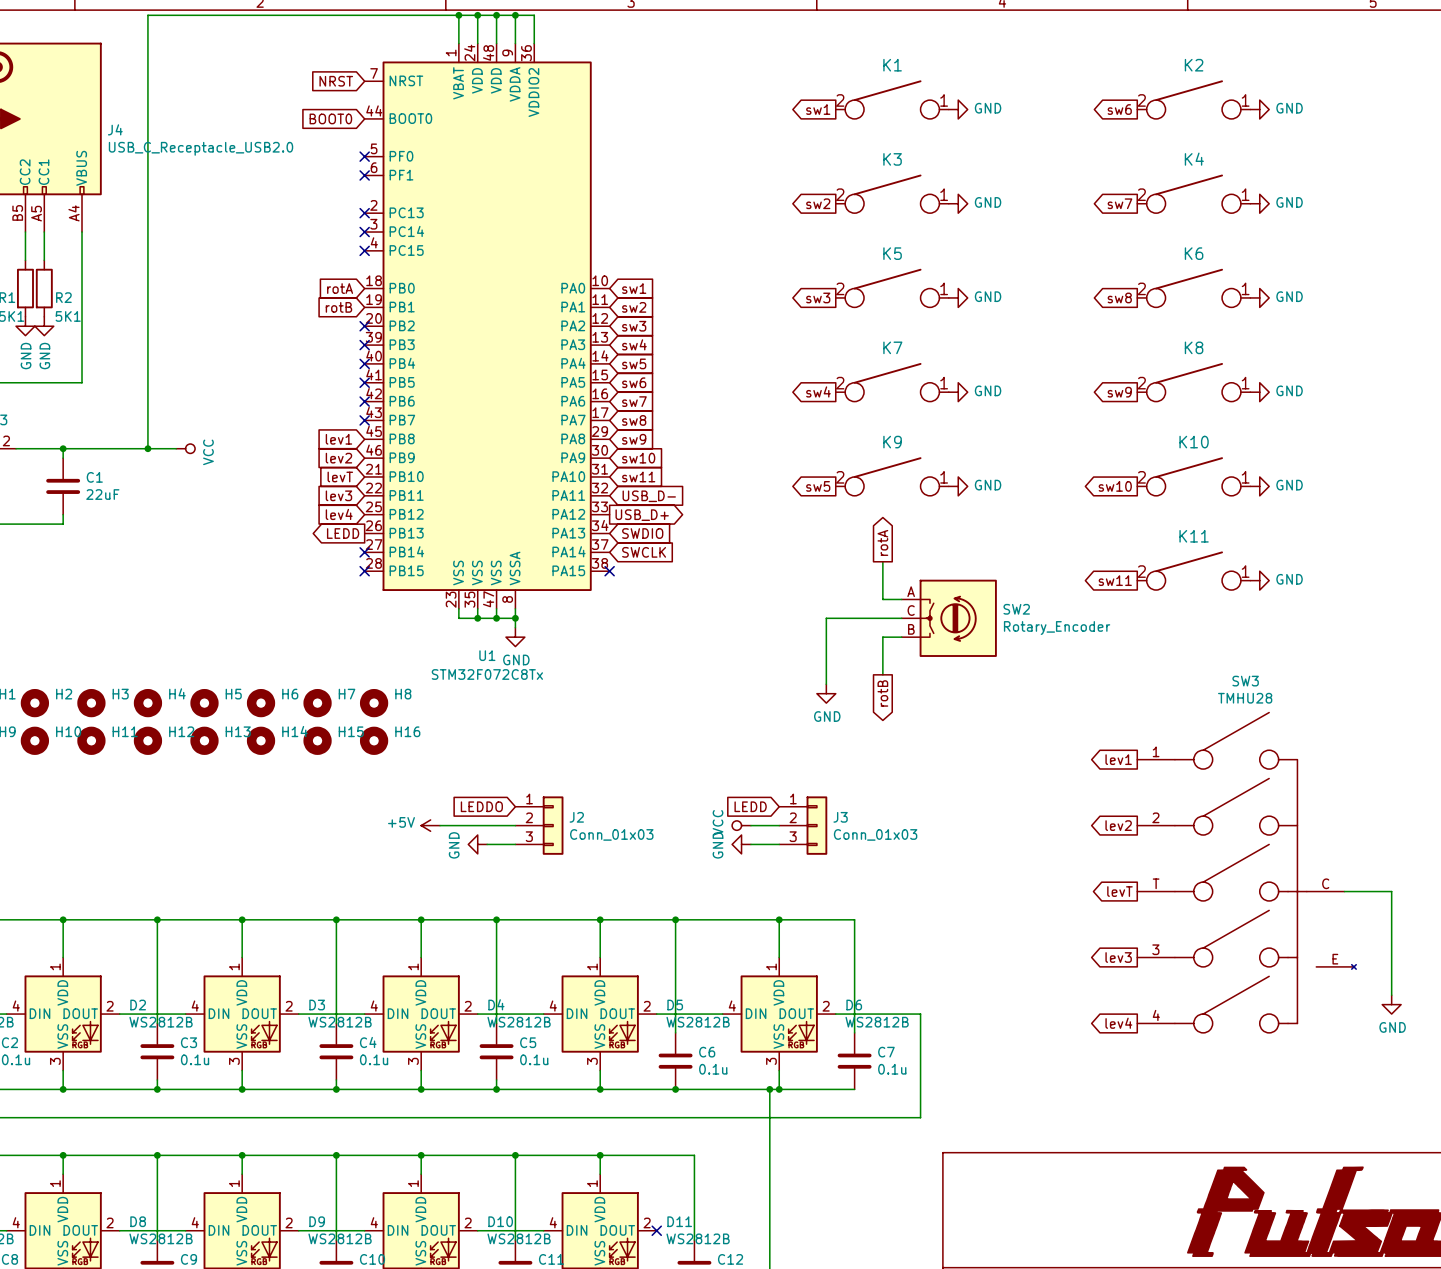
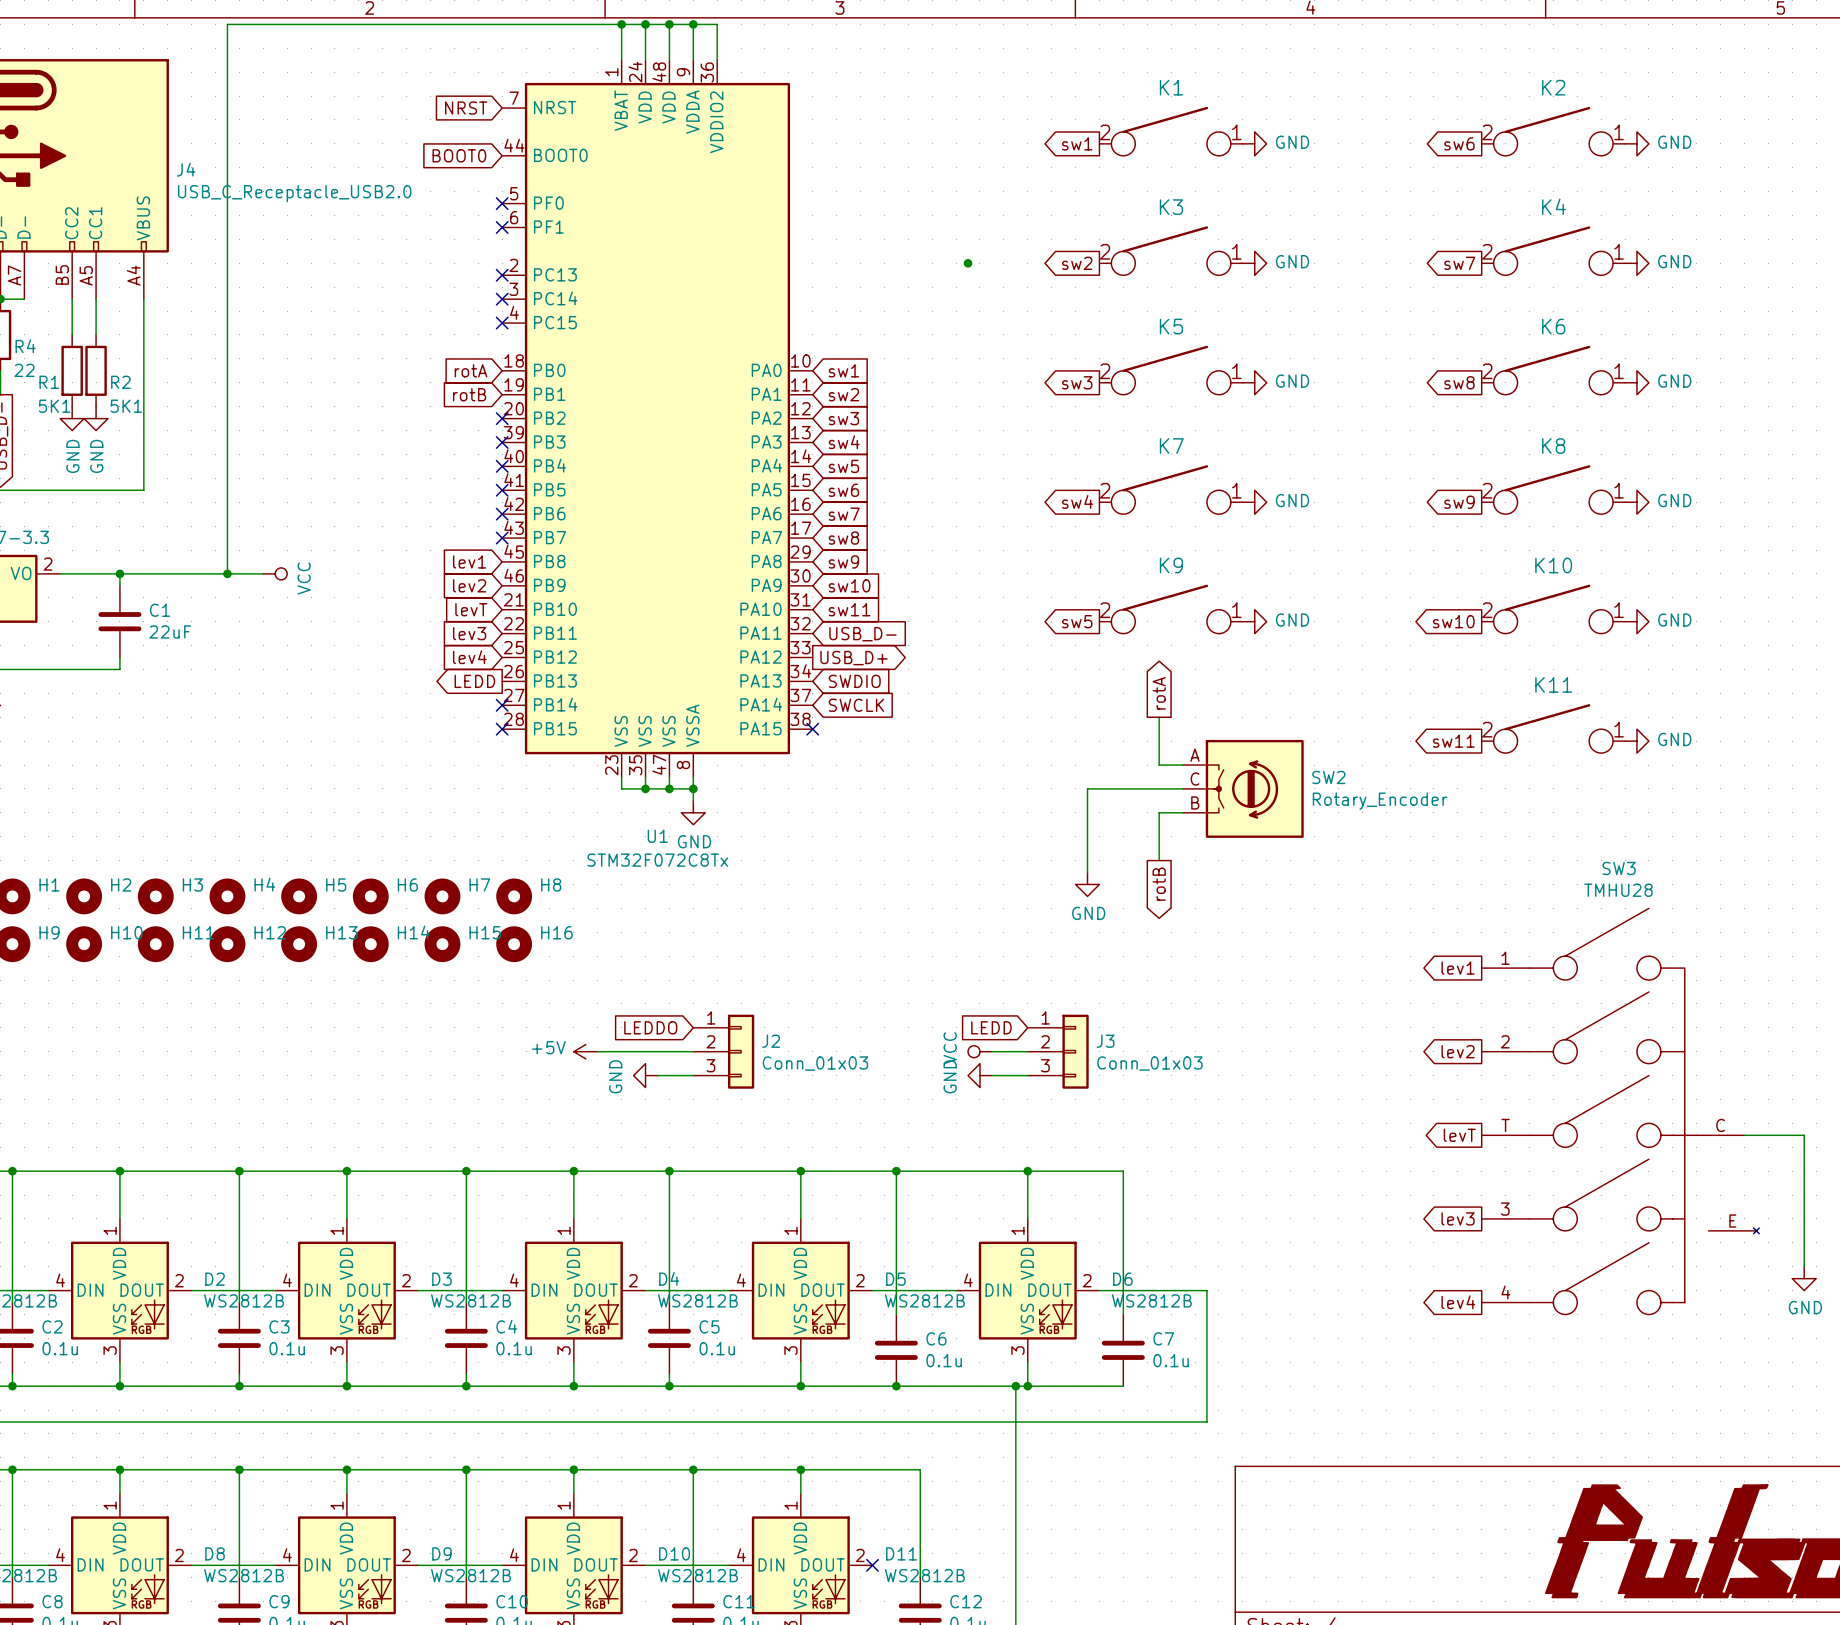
junction: none -> (968, 263)

